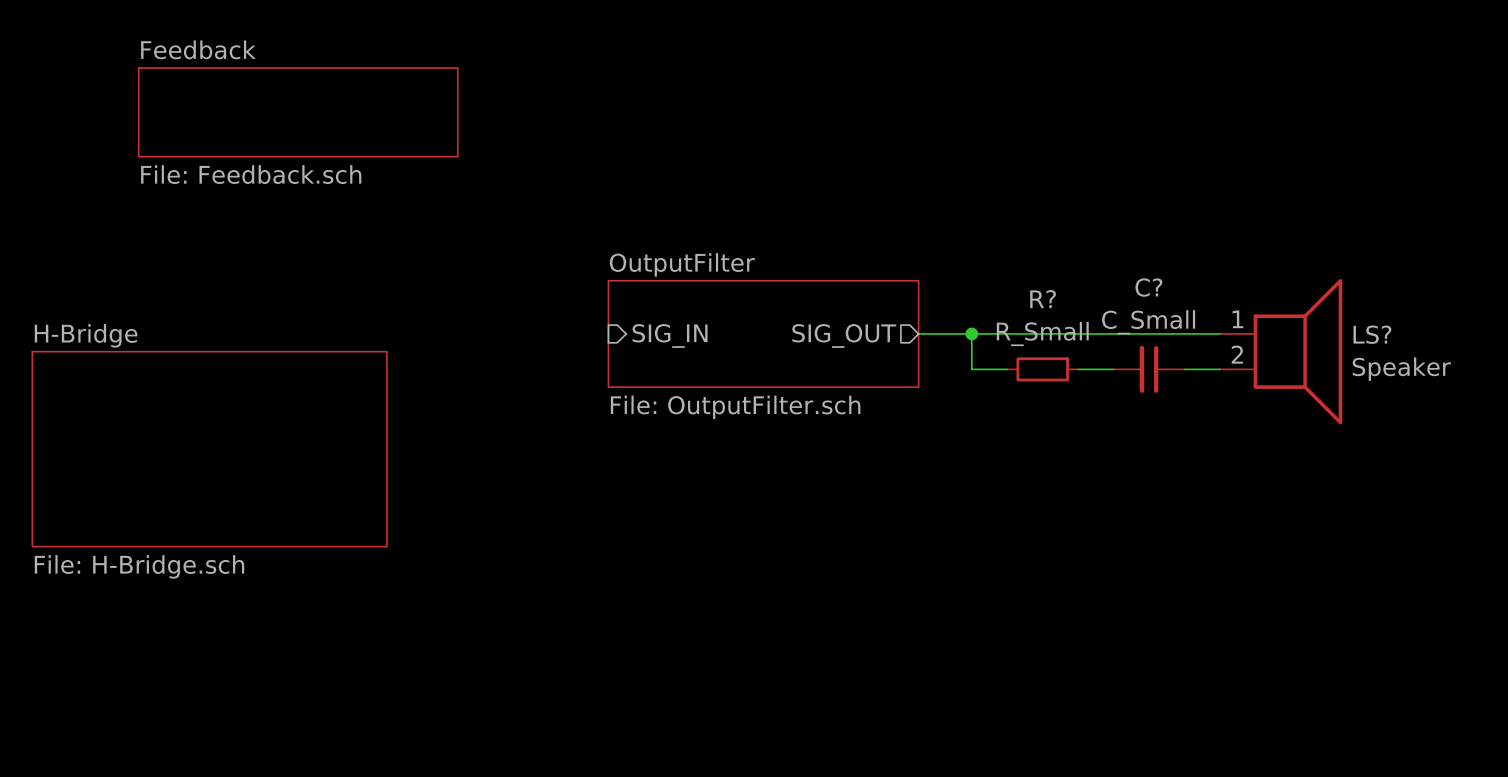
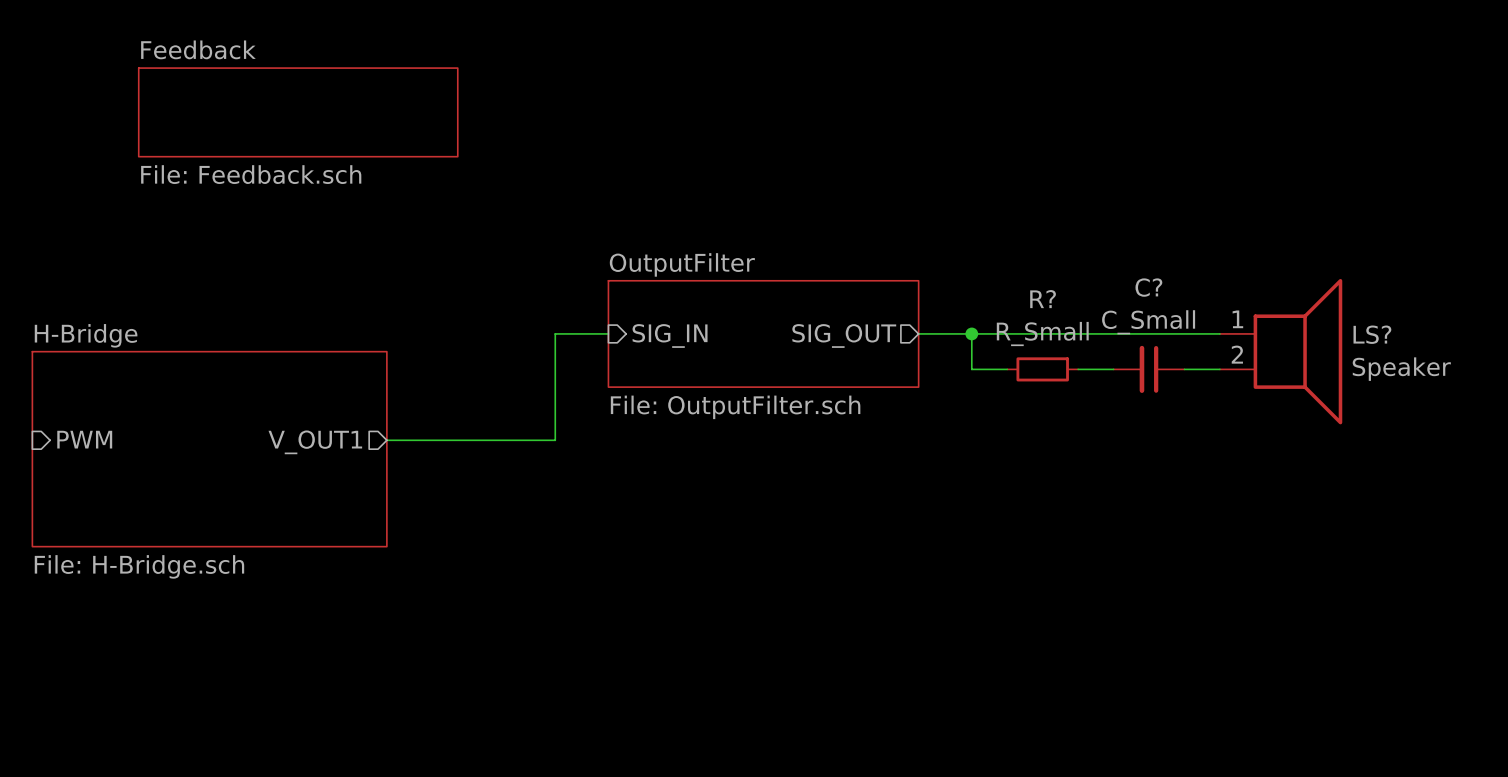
wire: none -> (608, 333) (555, 333) (555, 440) (386, 440)
sheet pin: none -> PWM (84, 439)
sheet pin: none -> V_OUT1 (315, 442)

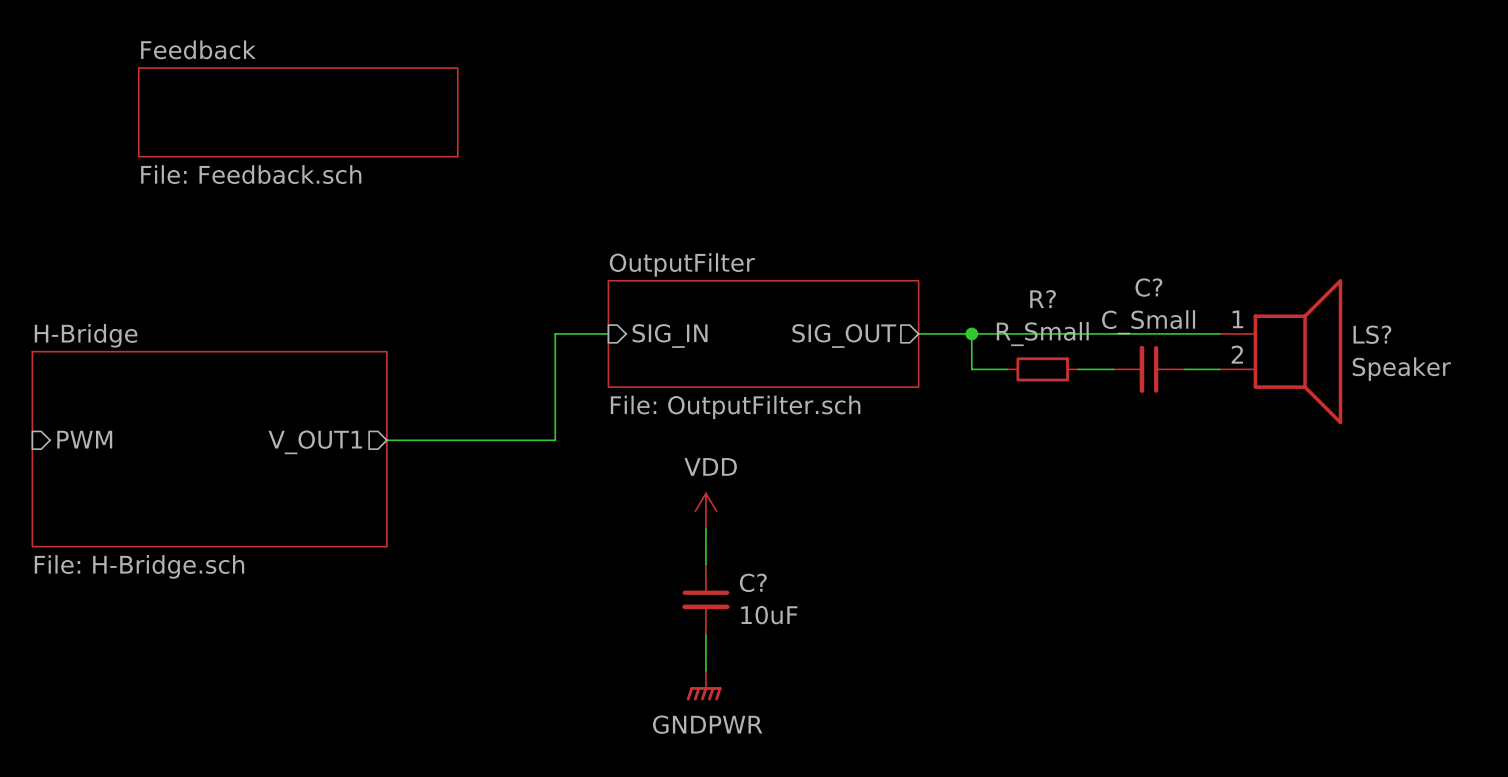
power symbol: none -> VDD (705, 511)
wire: none -> (705, 528) (705, 564)
C?: none -> 10uF (705, 599)
wire: none -> (705, 635) (705, 670)
power symbol: none -> GNDPWR (704, 685)

